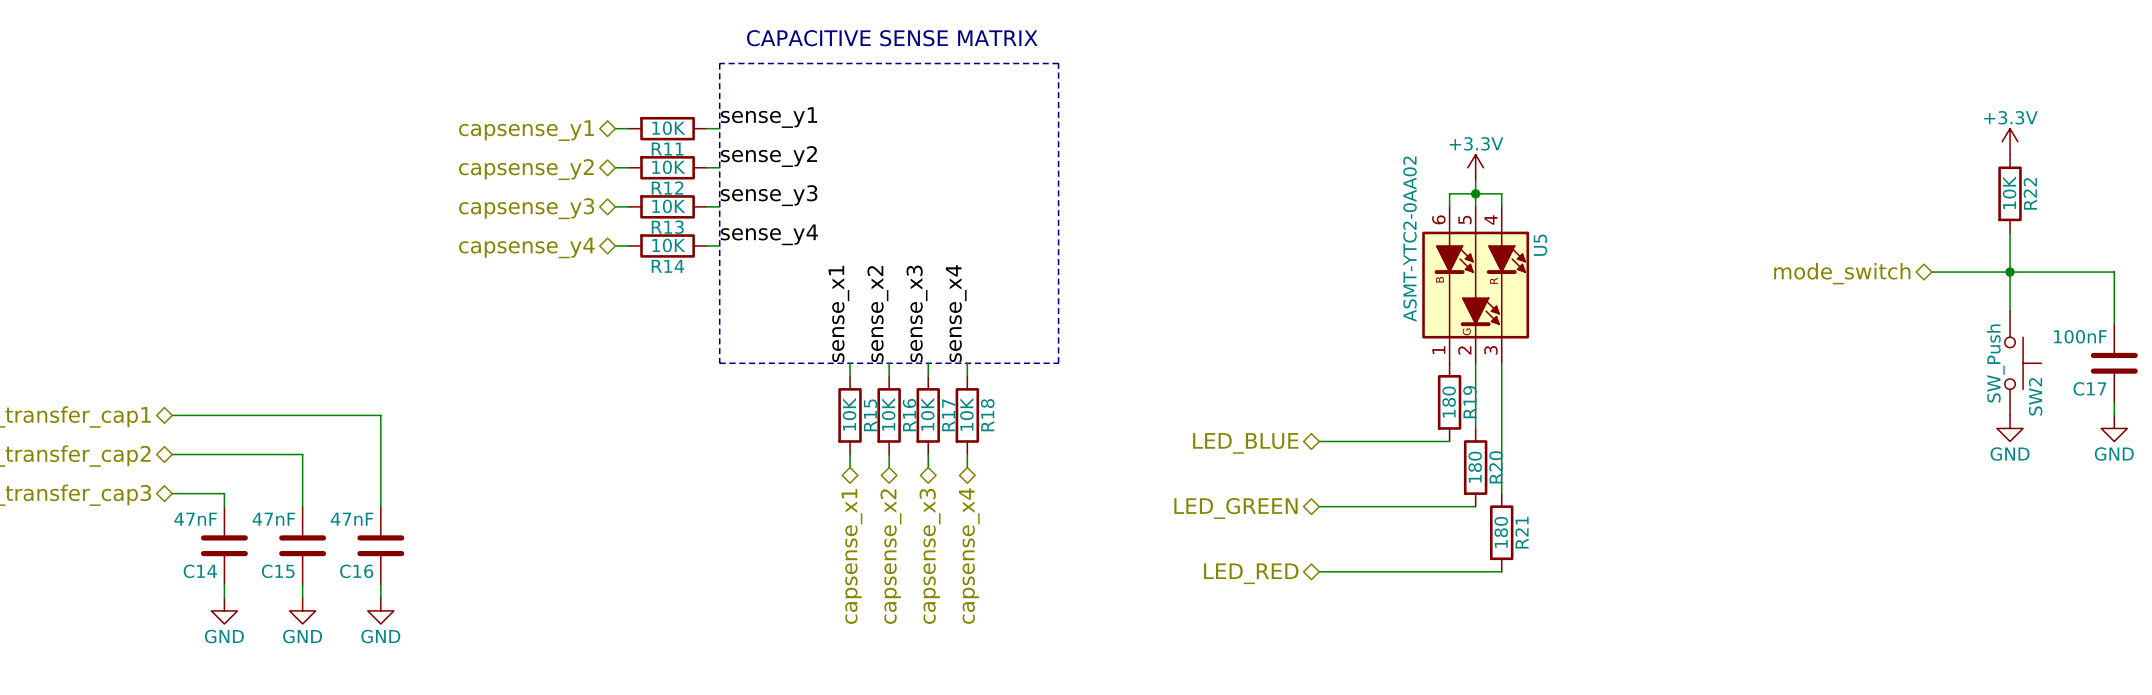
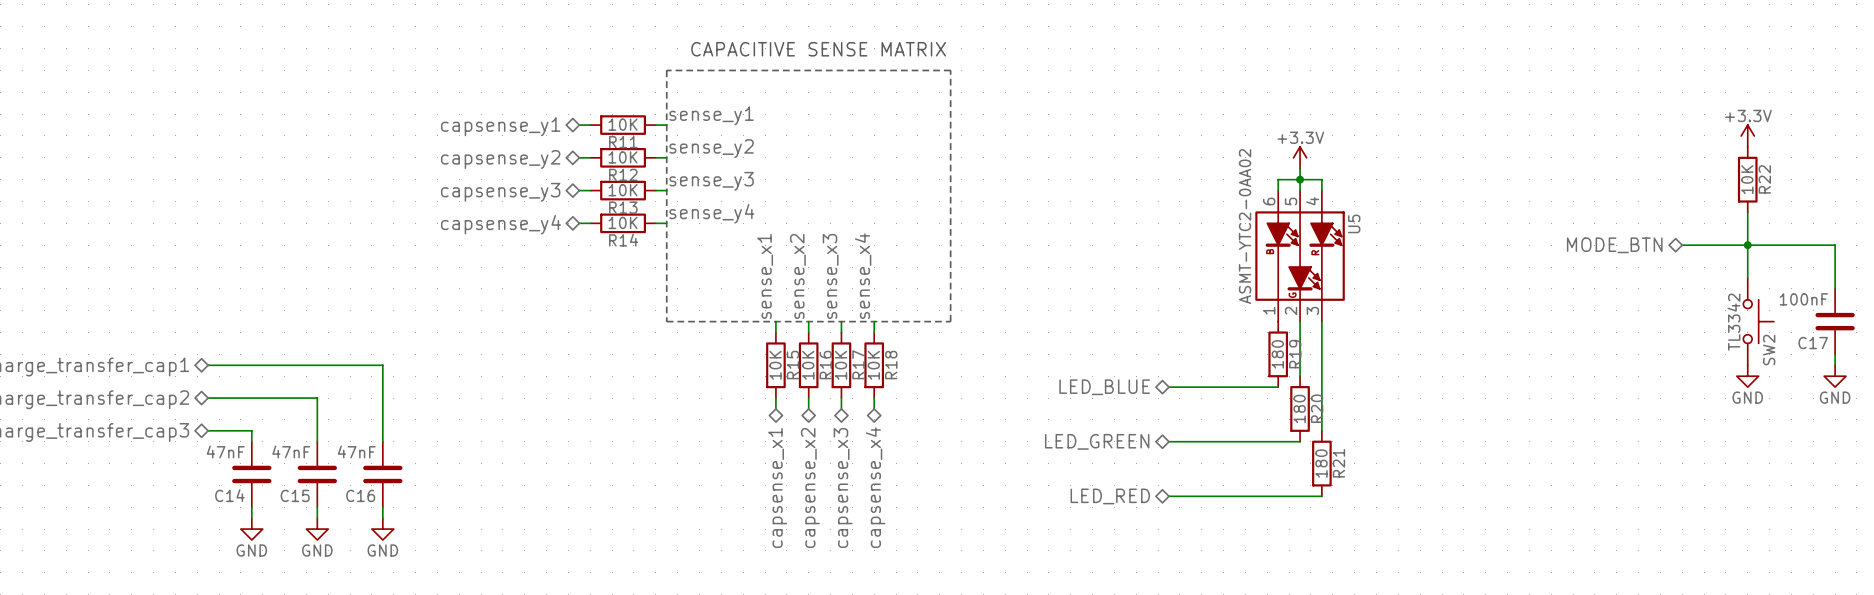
hierarchical label: mode_switch (1842, 273) -> MODE_BTN (1614, 245)
SW2 value: SW_Push (1995, 363) -> TL3342 (1733, 322)

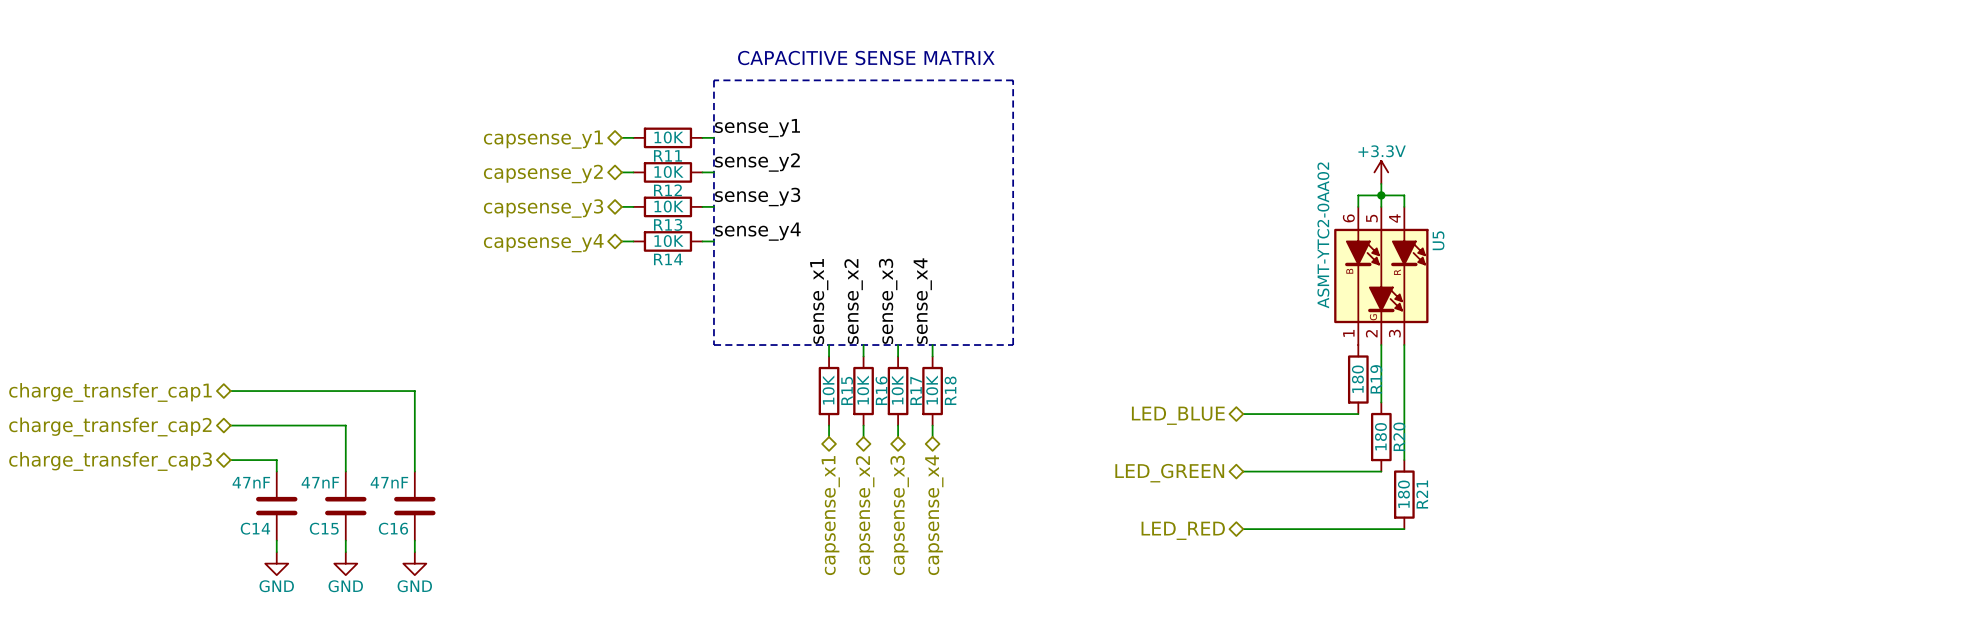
power symbol: +3.3V (1747, 135) -> none
R22: 10K (1747, 179) -> none
wire: (1747, 212) (1747, 277) -> none
hierarchical label: MODE_BTN (1614, 245) -> none
wire: (1682, 245) (1835, 245) (1835, 288) -> none
junction: (1747, 245) -> none
SW2: TL3342 (1758, 321) -> none
C17: 100nF (1835, 321) -> none
wire: (1835, 354) (1835, 365) -> none
power symbol: GND (1747, 376) -> none
power symbol: GND (1835, 376) -> none

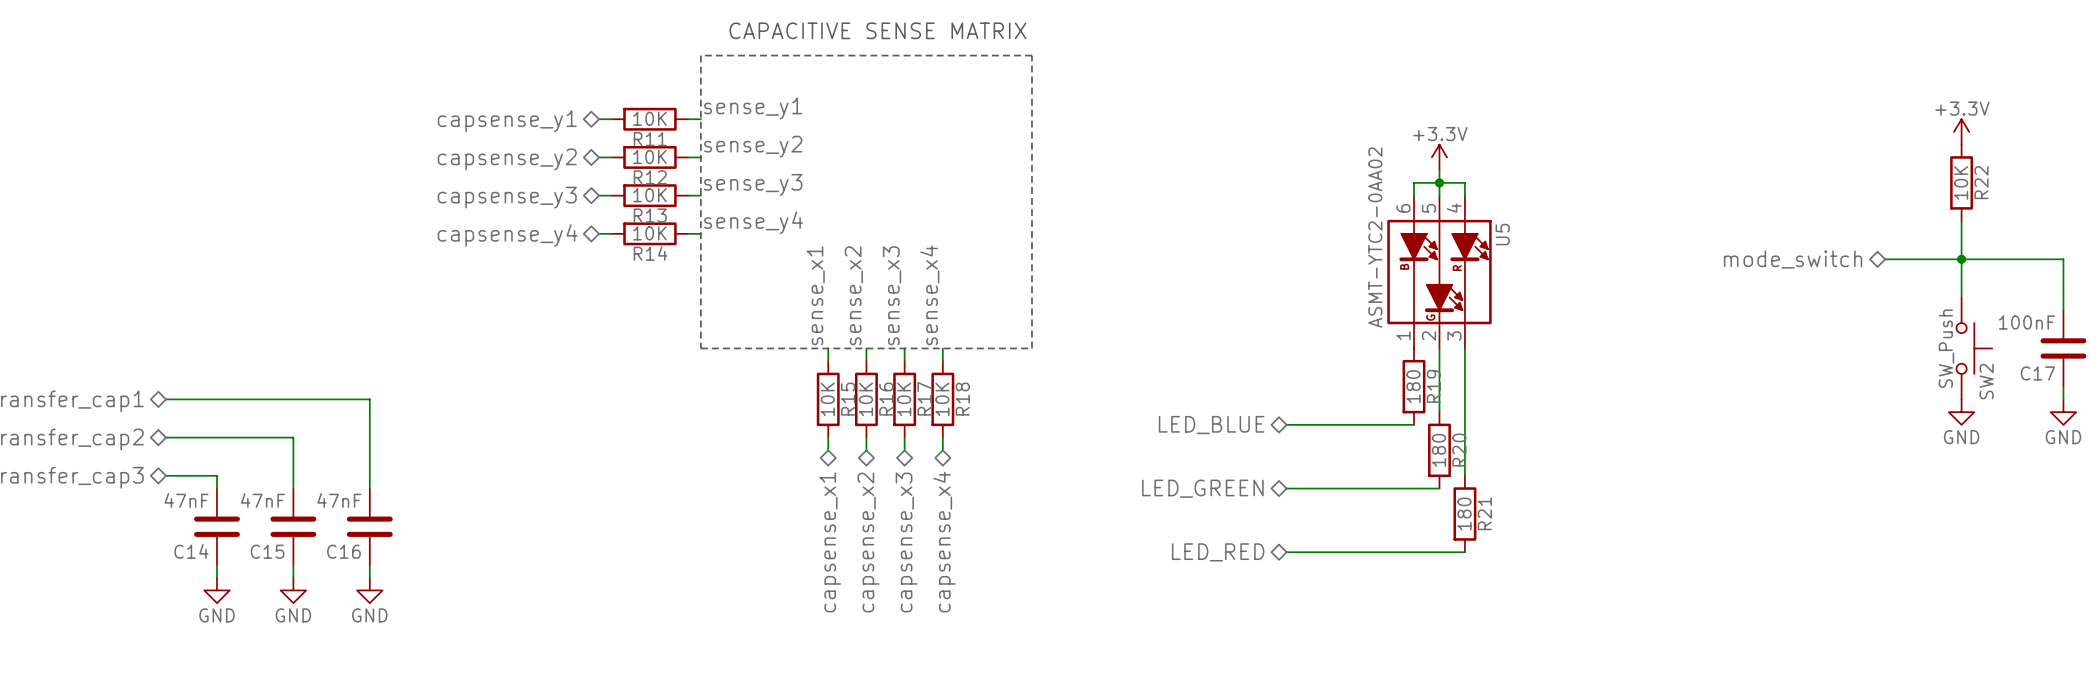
power symbol: none -> +3.3V (1961, 131)
R22: none -> 10K (1961, 182)
wire: none -> (1961, 221) (1961, 297)
wire: none -> (1885, 259) (2063, 259) (2063, 310)
junction: none -> (1961, 259)
hierarchical label: none -> mode_switch (1793, 259)
SW2: none -> SW_Push (1974, 348)
C17: none -> 100nF (2063, 348)
wire: none -> (2063, 386) (2063, 399)
power symbol: none -> GND (1961, 412)
power symbol: none -> GND (2063, 412)

